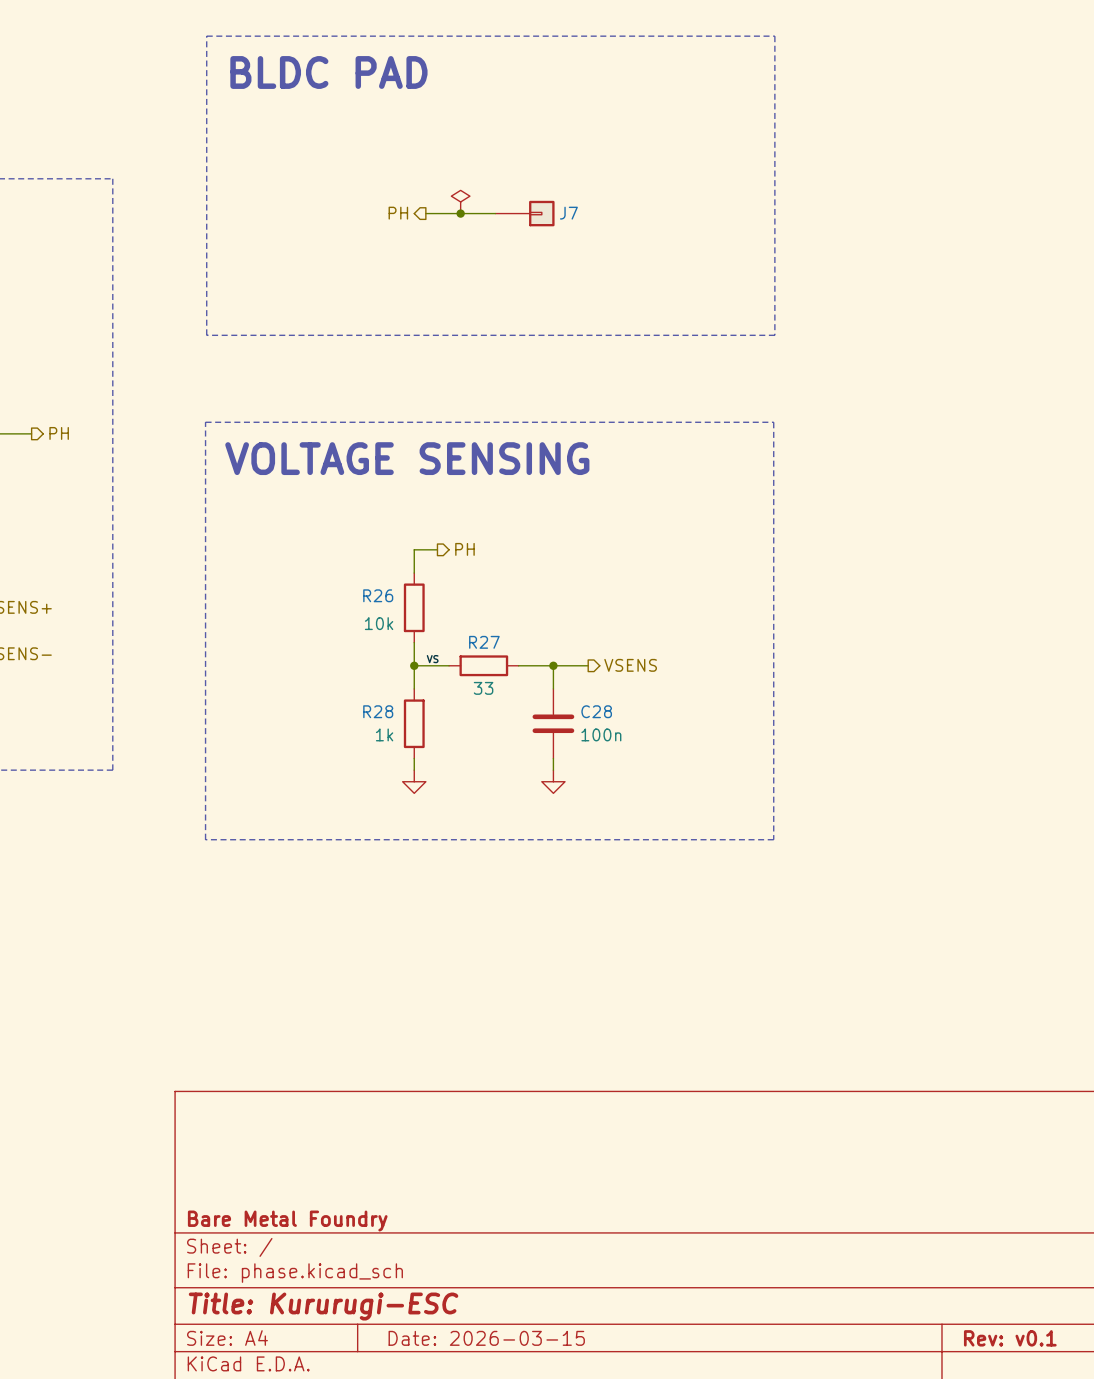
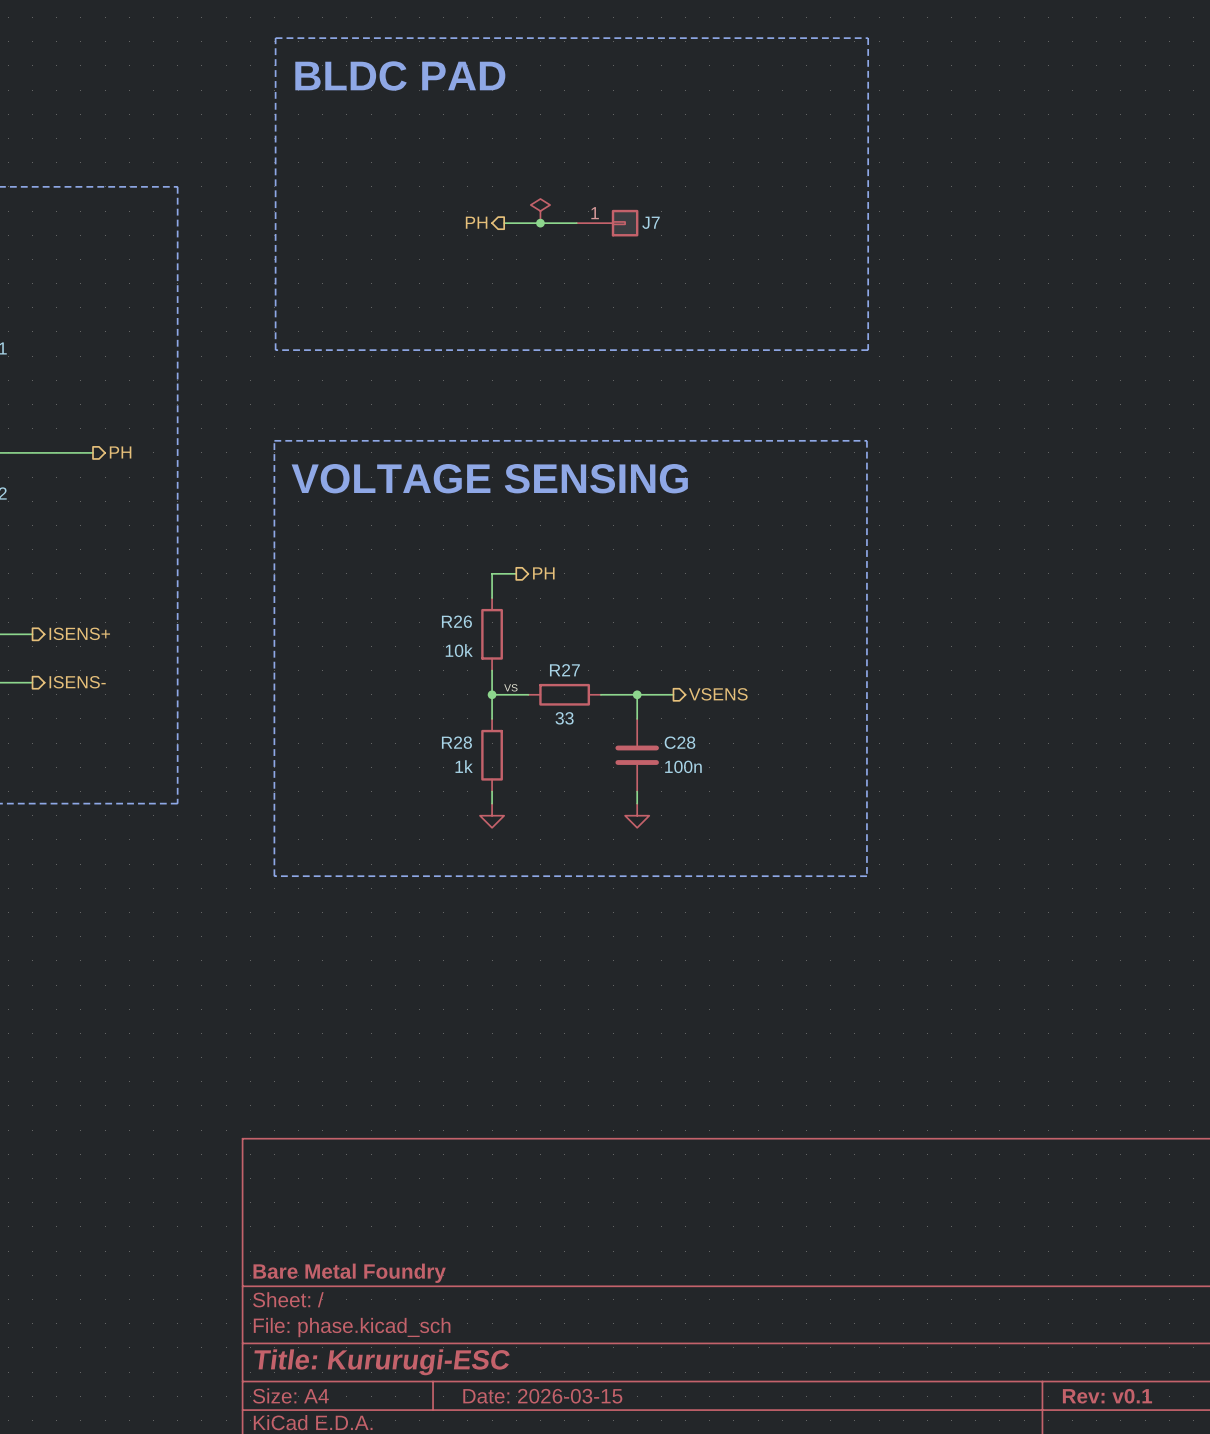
J7 pin number: none -> 1 (595, 213)

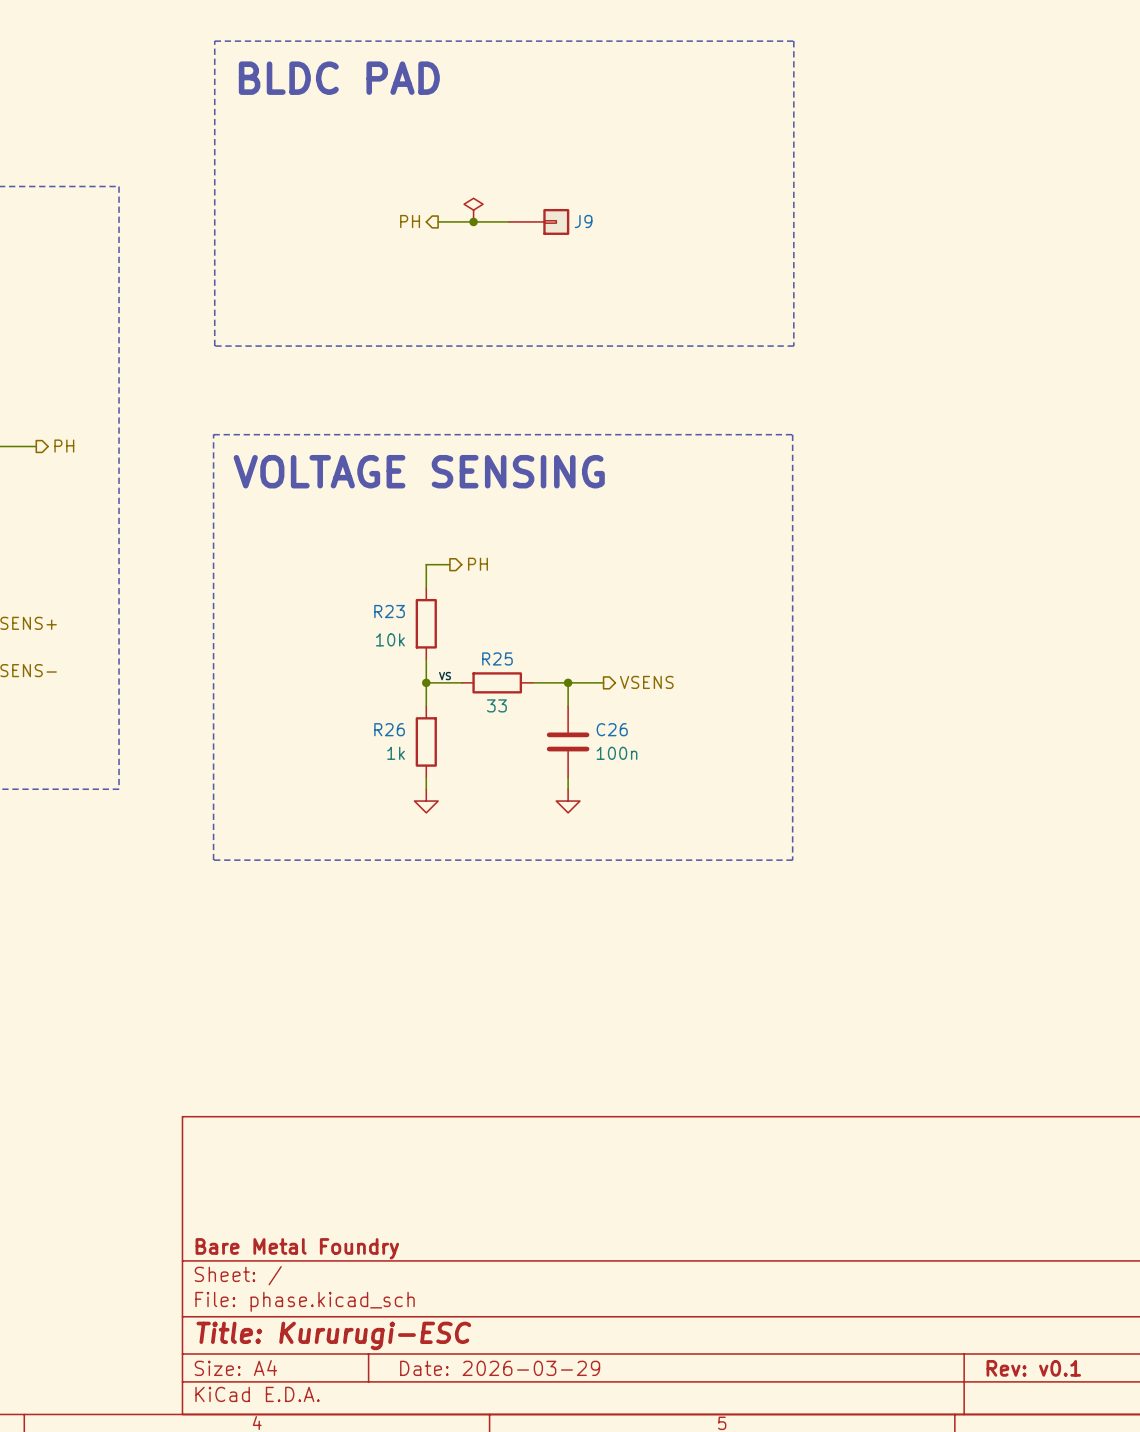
J7 pin number: 1 (595, 213) -> none
J7 name: J7 (651, 222) -> J9 (583, 221)
R26 name: R26 (456, 621) -> R23 (389, 611)
R27 name: R27 (564, 670) -> R25 (497, 658)
R28 name: R28 (456, 742) -> R26 (389, 729)
C28 name: C28 (679, 742) -> C26 (612, 729)
title block: Date: 2026-03-15 (542, 1396) -> Date: 2026-03-29 (500, 1368)

